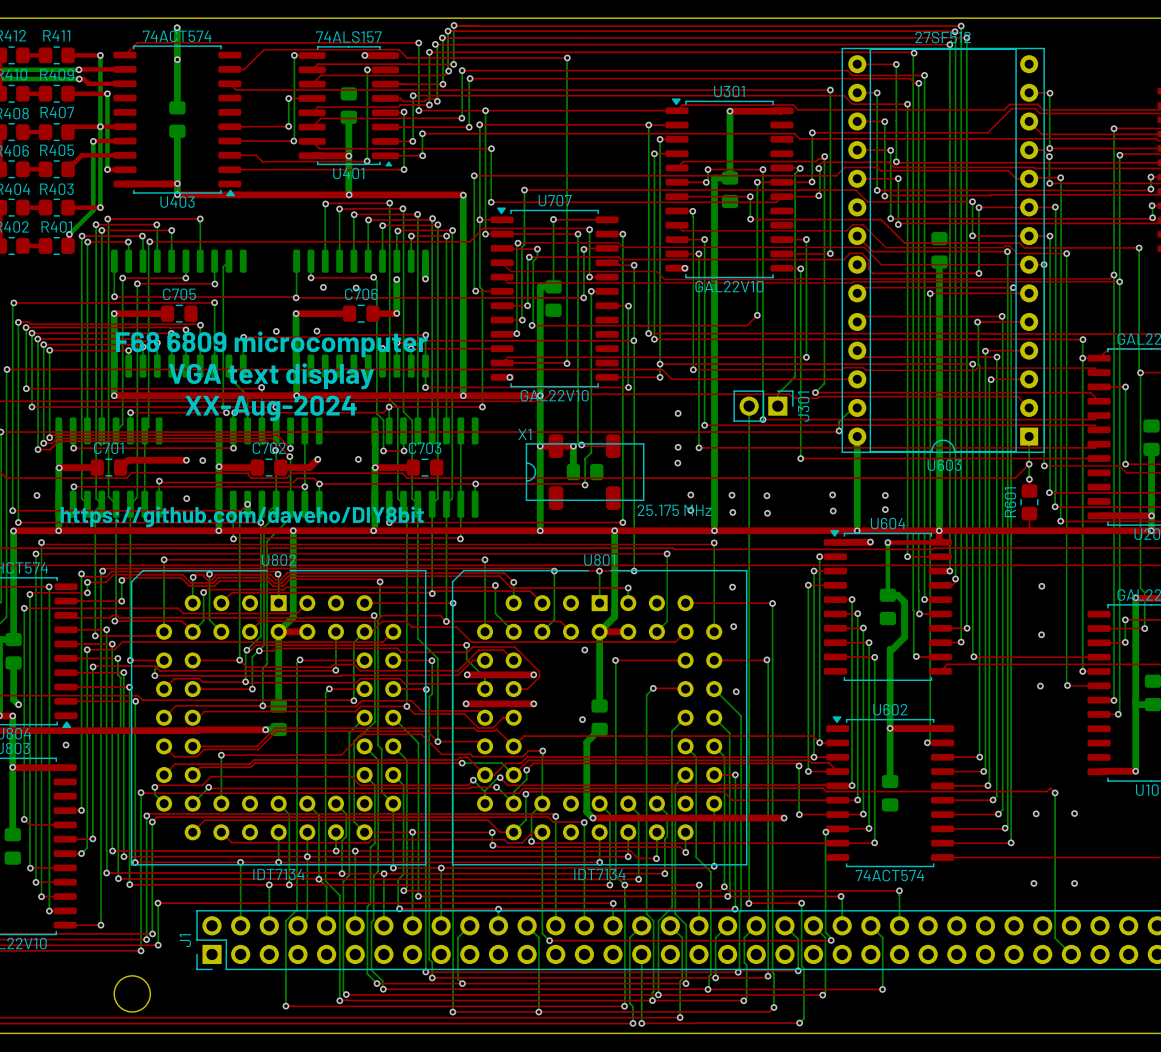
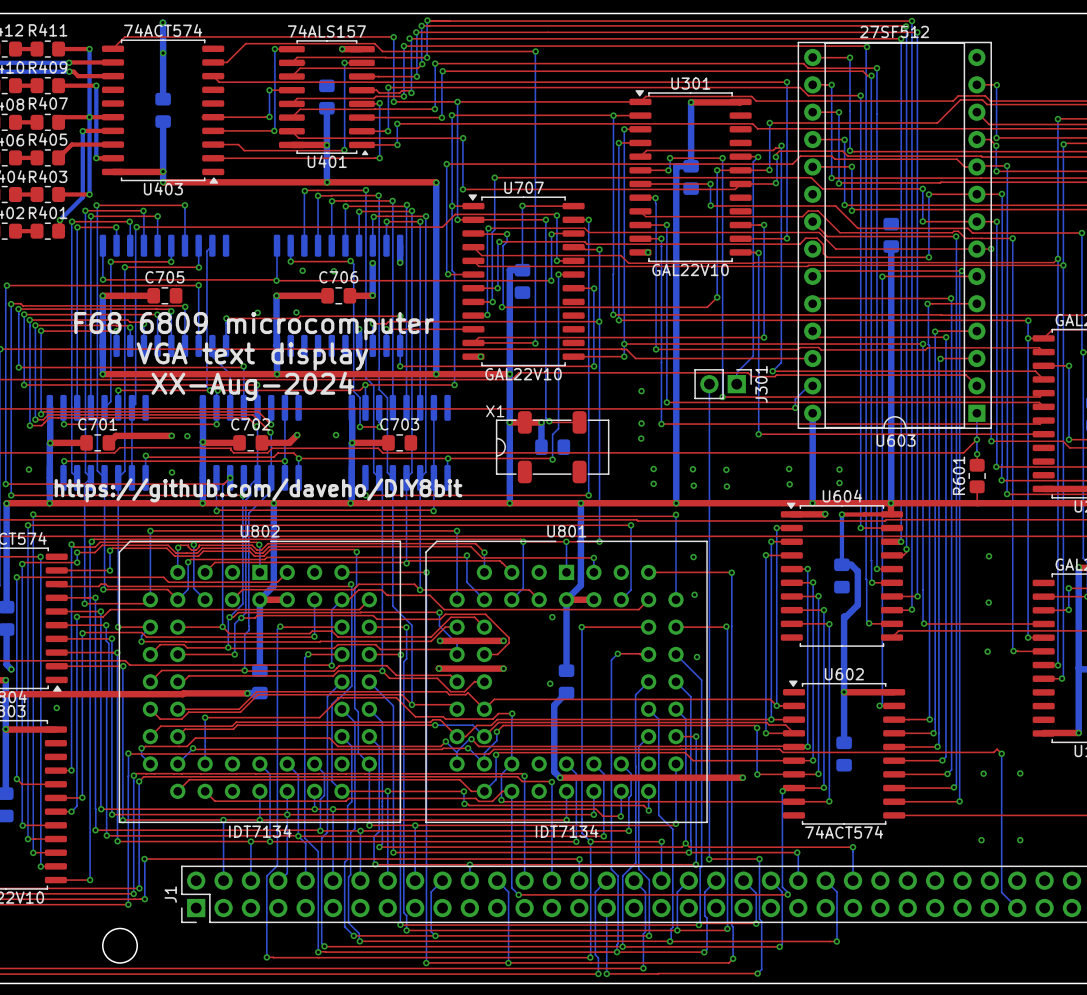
X1 footprint: [525, 434, 645, 510] -> [496, 411, 610, 484]
X1 value: 25.175 MHz (674, 510) -> none

